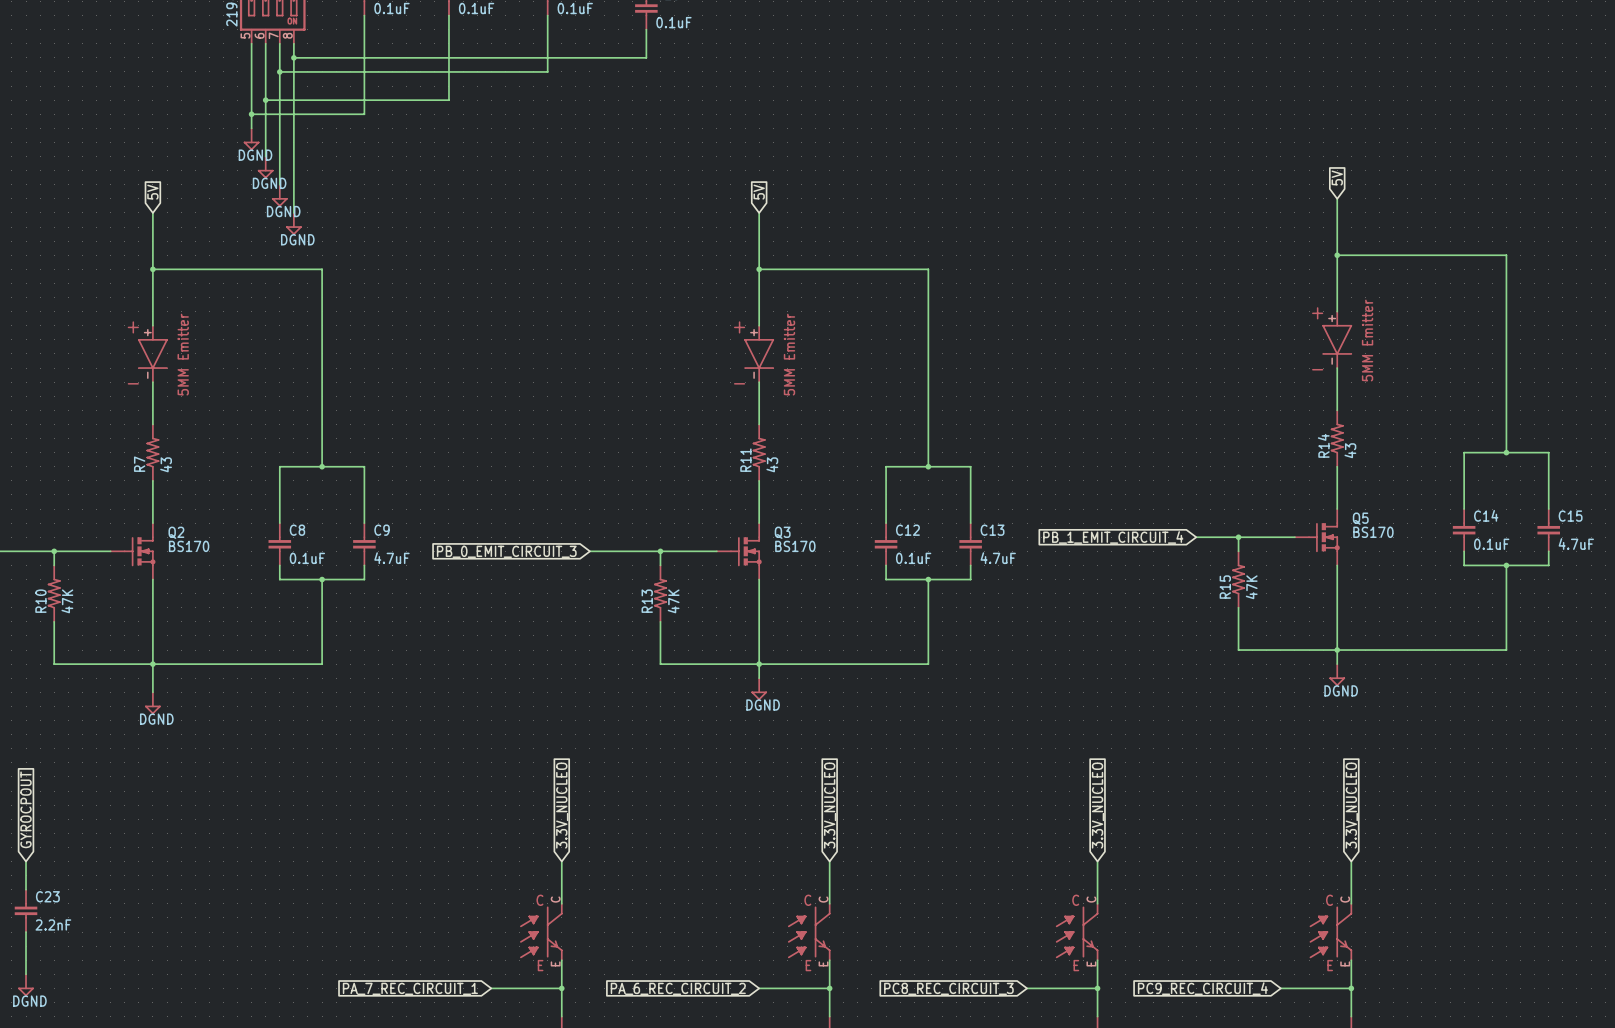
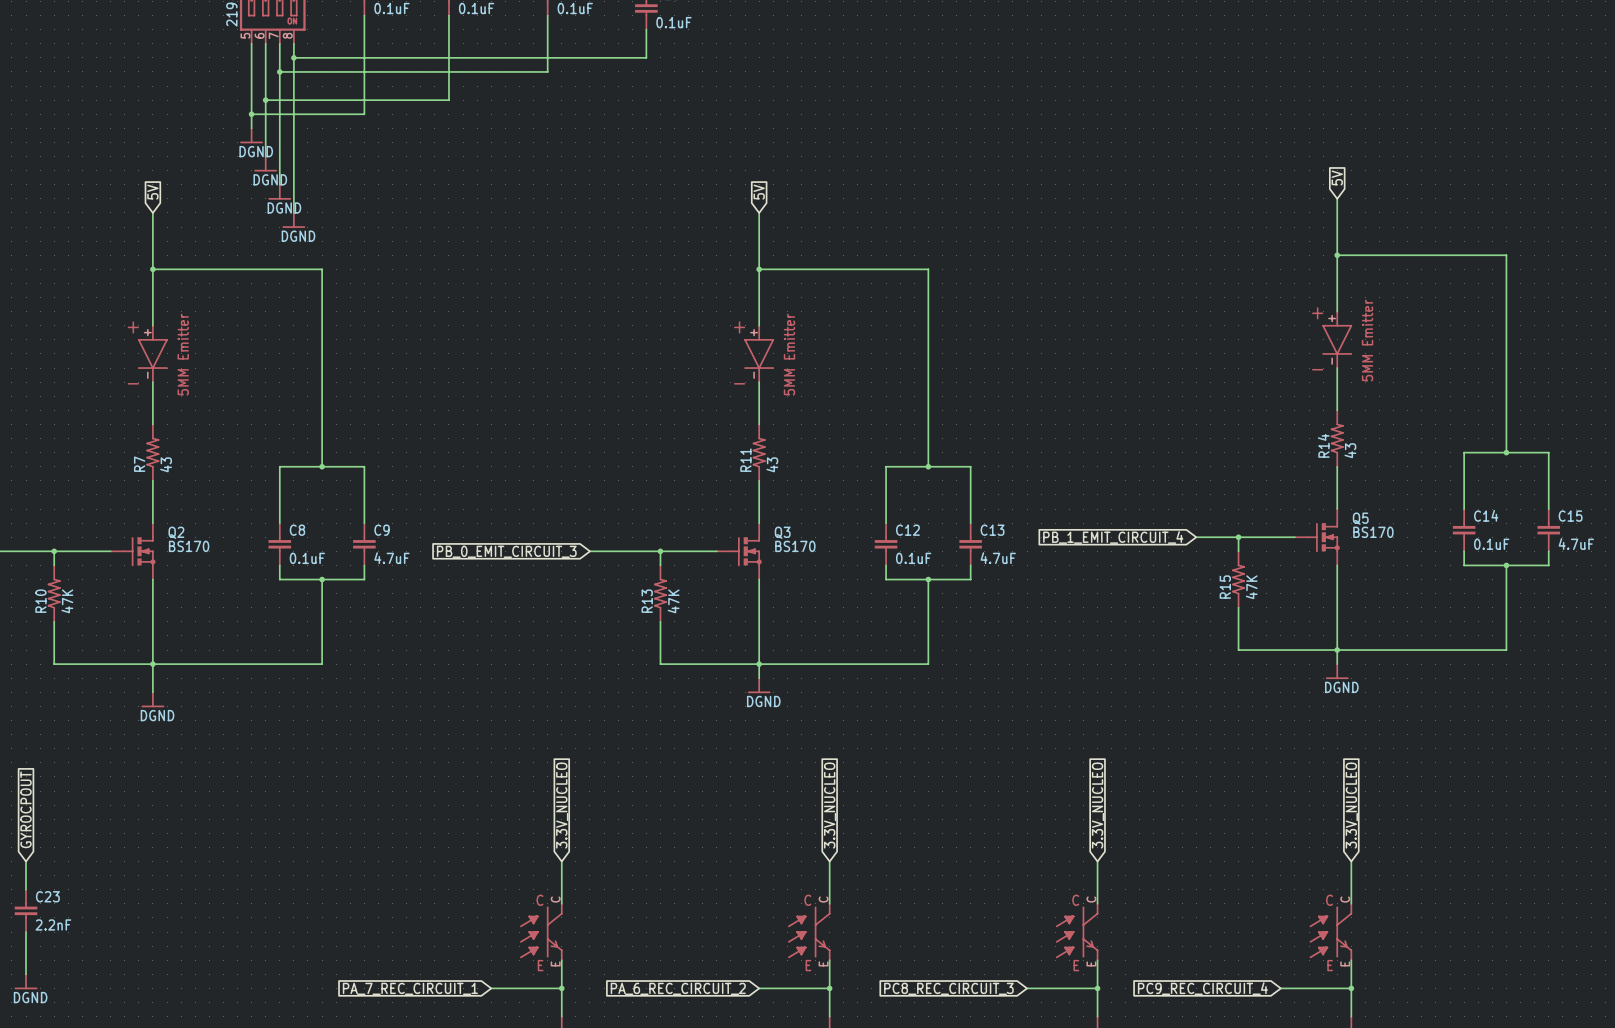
power symbol shape: [243, 128, 260, 151] -> [240, 128, 263, 144]
power symbol shape: [257, 156, 274, 179] -> [254, 156, 277, 172]
power symbol shape: [272, 184, 288, 207] -> [268, 184, 292, 200]
power symbol shape: [286, 212, 302, 235] -> [282, 212, 306, 228]
power symbol shape: [1329, 664, 1345, 686] -> [1325, 664, 1349, 679]
power symbol shape: [751, 678, 767, 701] -> [747, 678, 771, 694]
power symbol shape: [145, 692, 161, 715] -> [141, 692, 165, 708]
power symbol shape: [18, 974, 34, 997] -> [14, 974, 38, 990]

